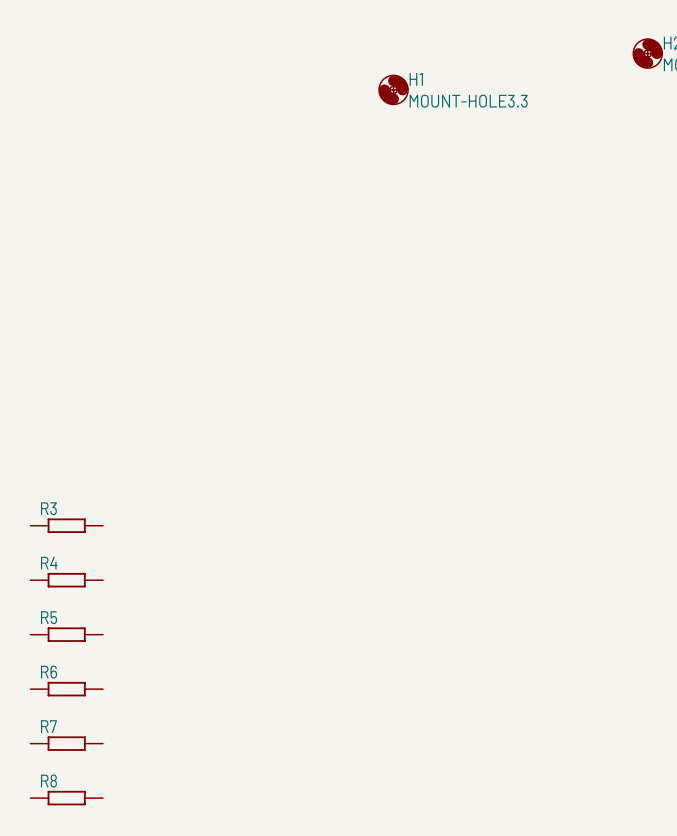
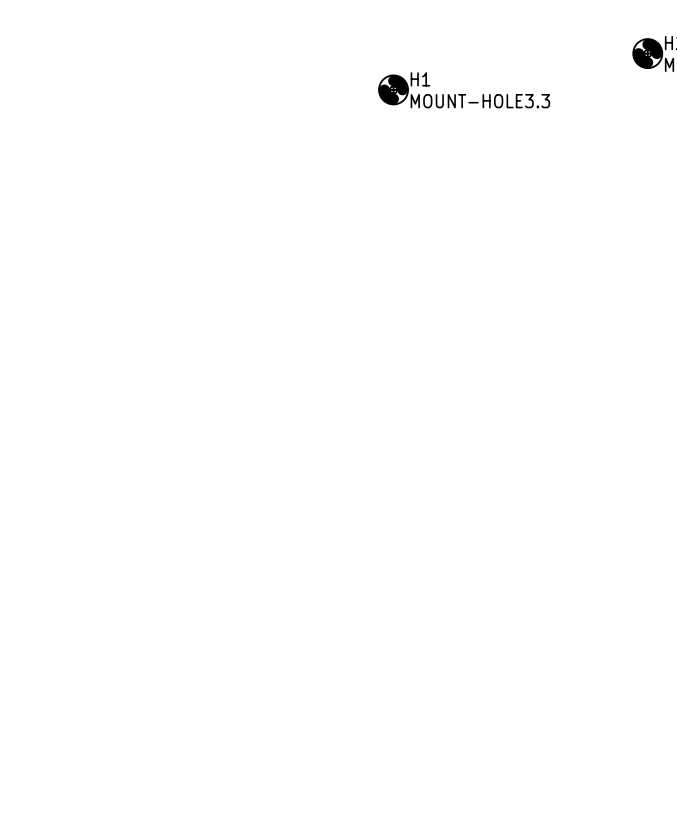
R3: (66, 525) -> none
R4: (66, 580) -> none
R5: (66, 634) -> none
R6: (66, 689) -> none
R7: (66, 743) -> none
R8: (66, 798) -> none

